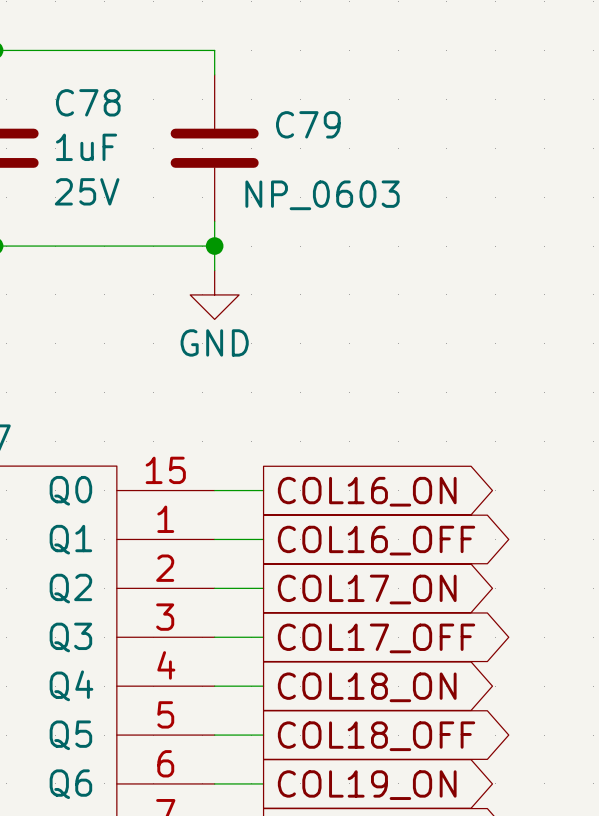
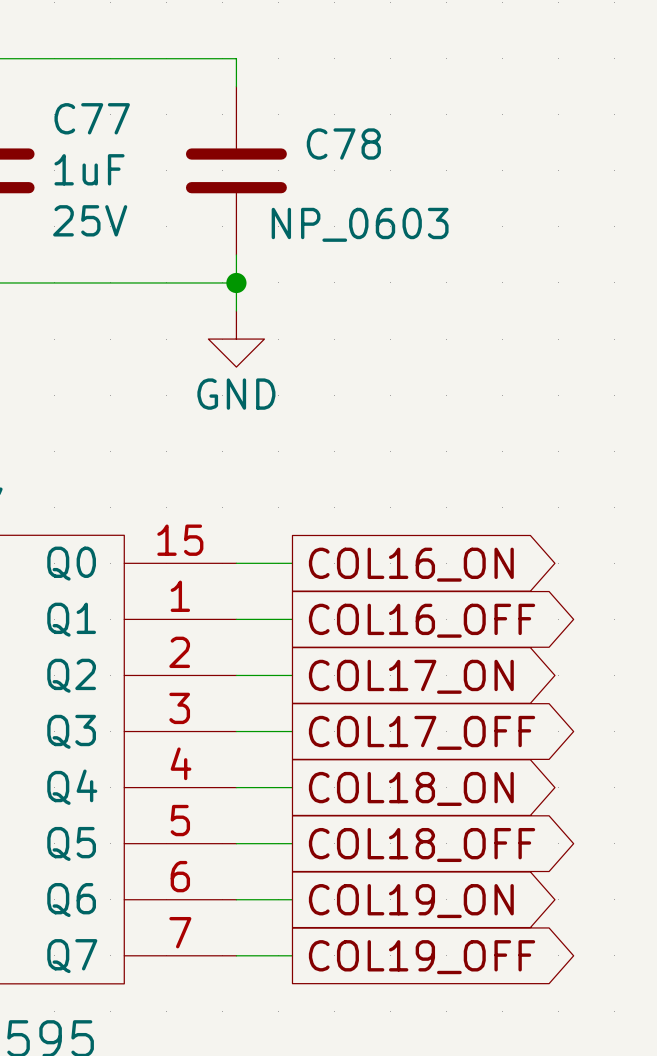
C78 name: C78 (88, 102) -> C77 (92, 118)
C79 name: C79 (308, 124) -> C78 (343, 144)

